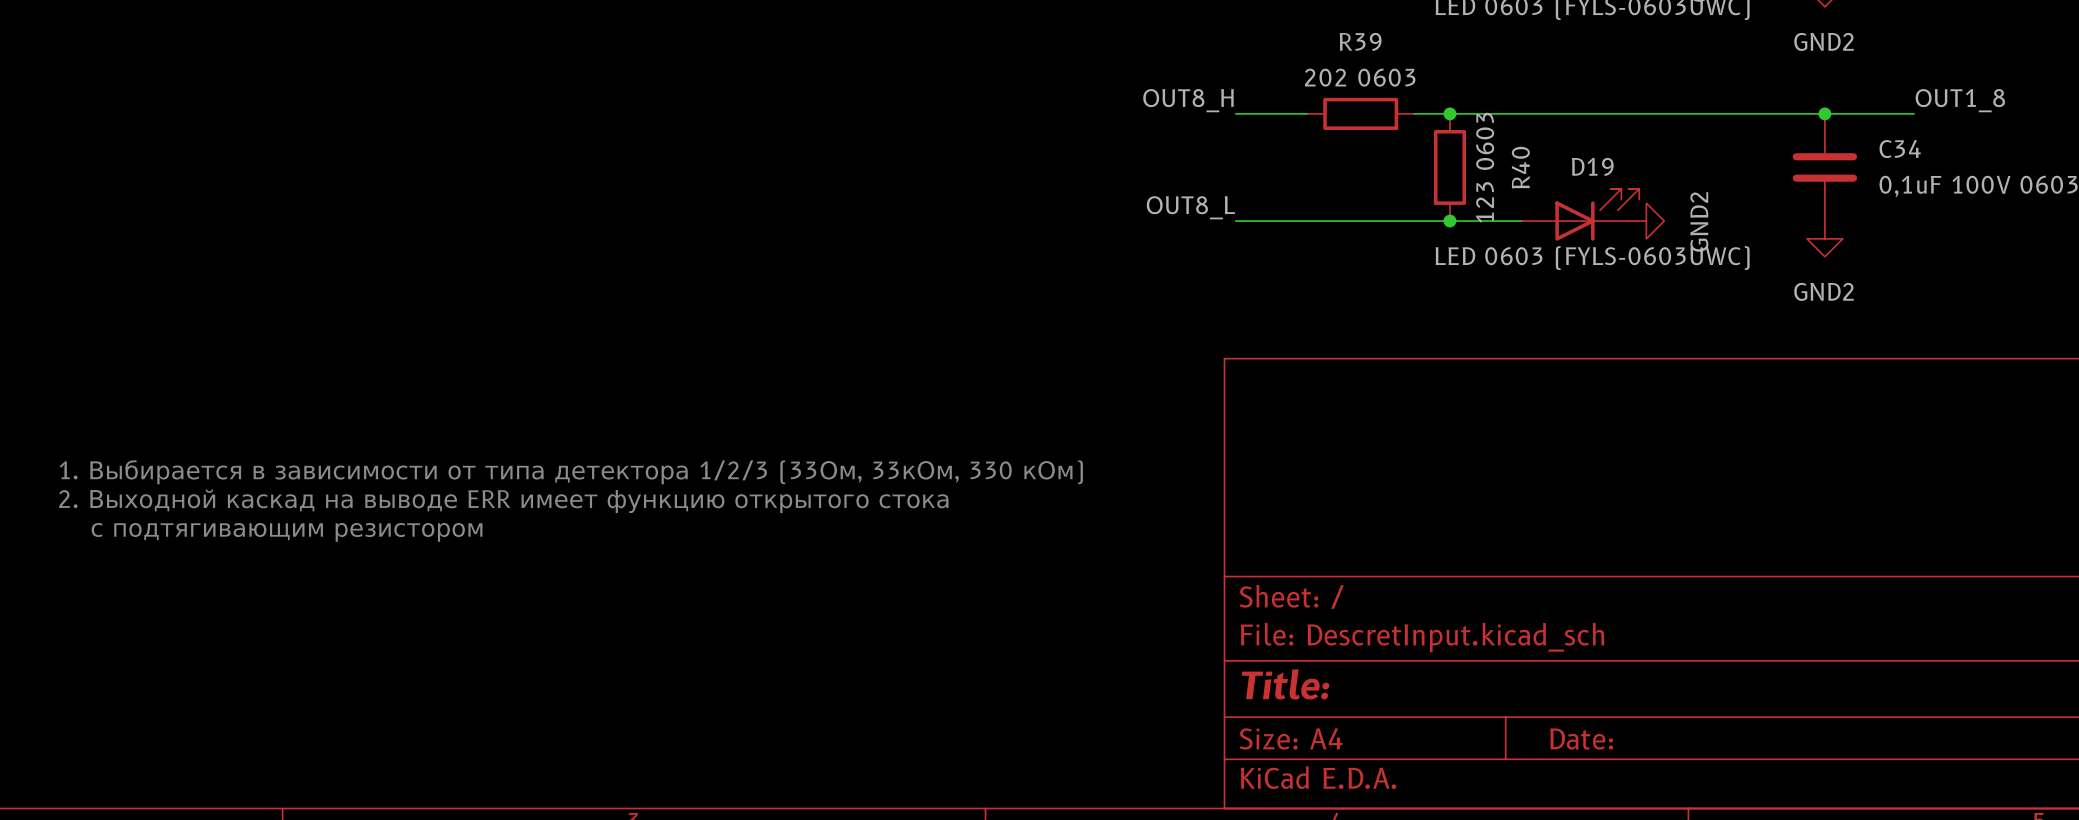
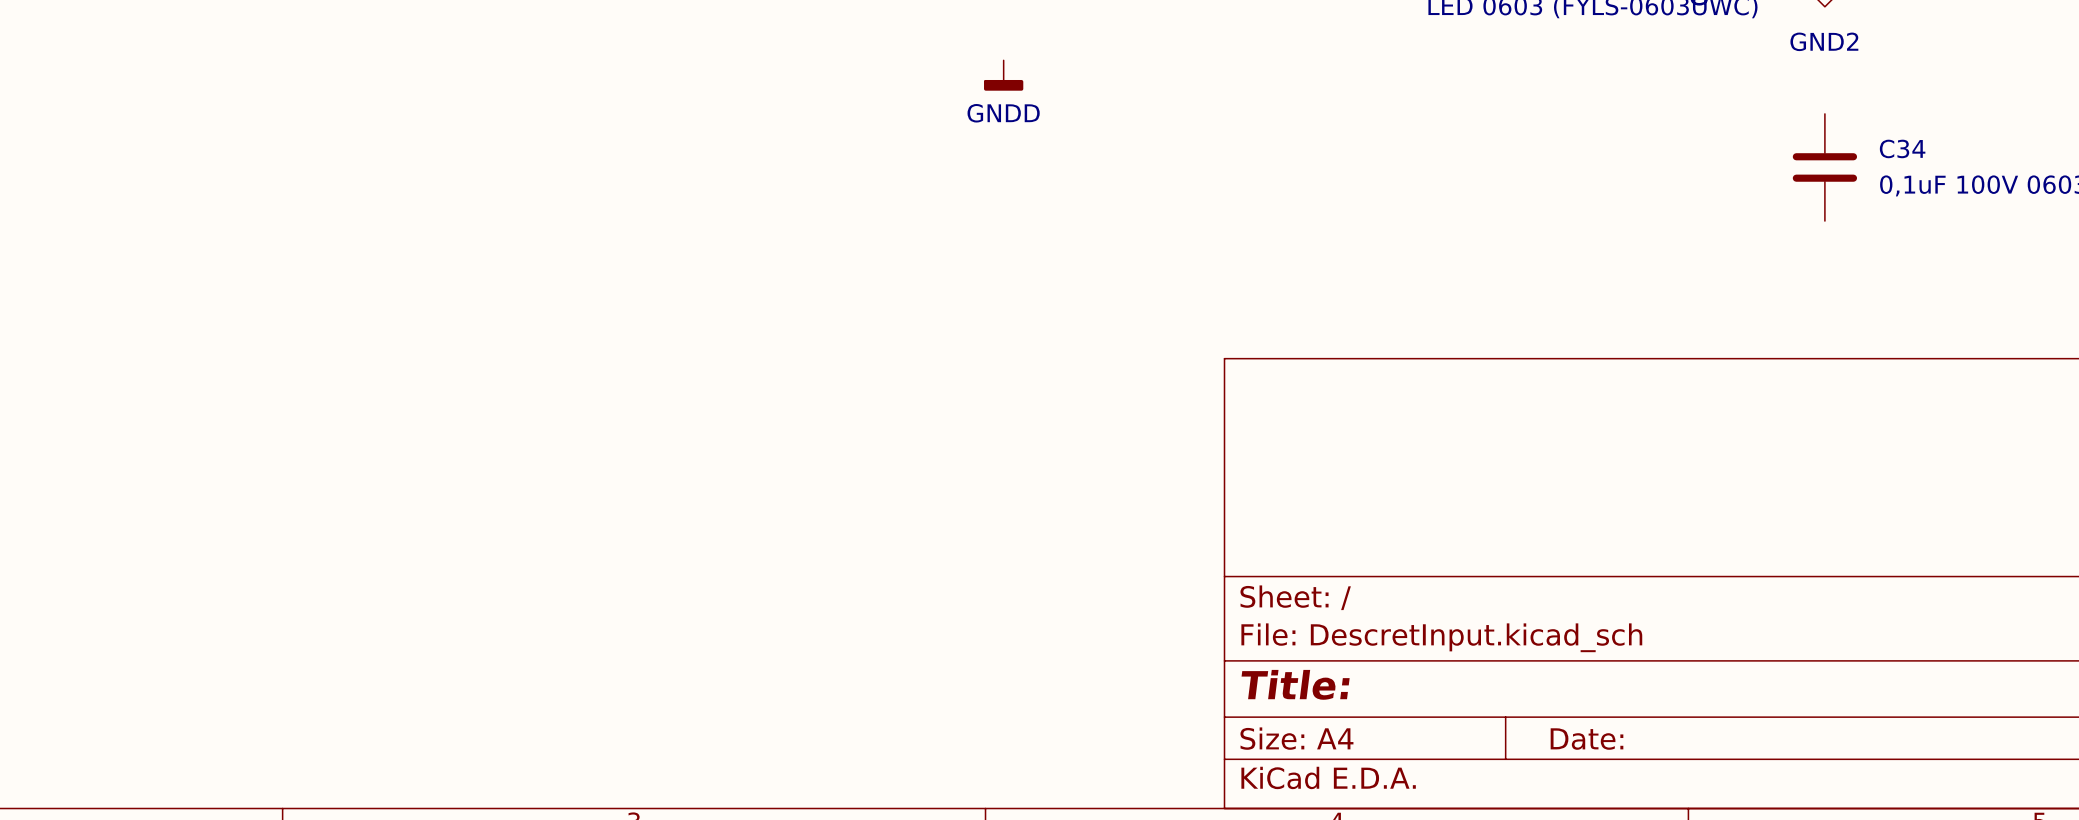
power symbol: none -> GNDD (1003, 75)
label: OUT8_H (1188, 100) -> none
label: OUT1_8 (1960, 100) -> none
wire: (1235, 113) (1307, 113) -> none
R39: 202 0603 (1360, 113) -> none
wire: (1414, 113) (1914, 113) -> none
junction: (1449, 113) -> none
junction: (1824, 113) -> none
R40: 123 0603 (1449, 167) -> none
label: OUT8_L (1190, 207) -> none
D19: LED 0603 (FYLS-0603UWC) (1580, 214) -> none
wire: (1235, 221) (1521, 221) -> none
junction: (1449, 221) -> none
power symbol: GND2 (1646, 221) -> none
power symbol: GND2 (1824, 238) -> none
text: 1. Выбирается в зависимости от типа детектора 1/2/3 (33Ом, 33кОм, 330 кОм) (571, 472) -> none
text: 2. Выходной каскад на выводе ERR имеет функцию открытого стока (503, 501) -> none
text: с подтягивающим резистором (287, 532) -> none

